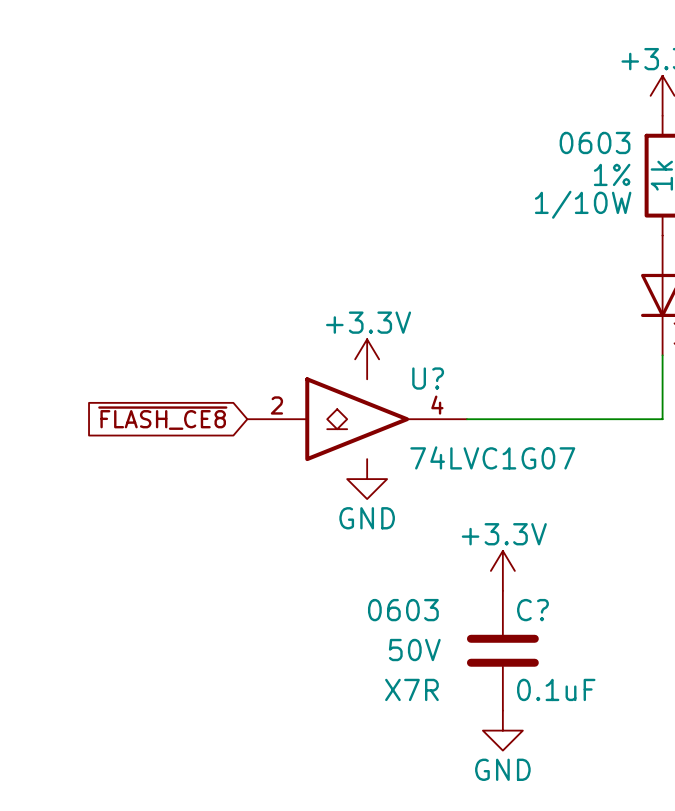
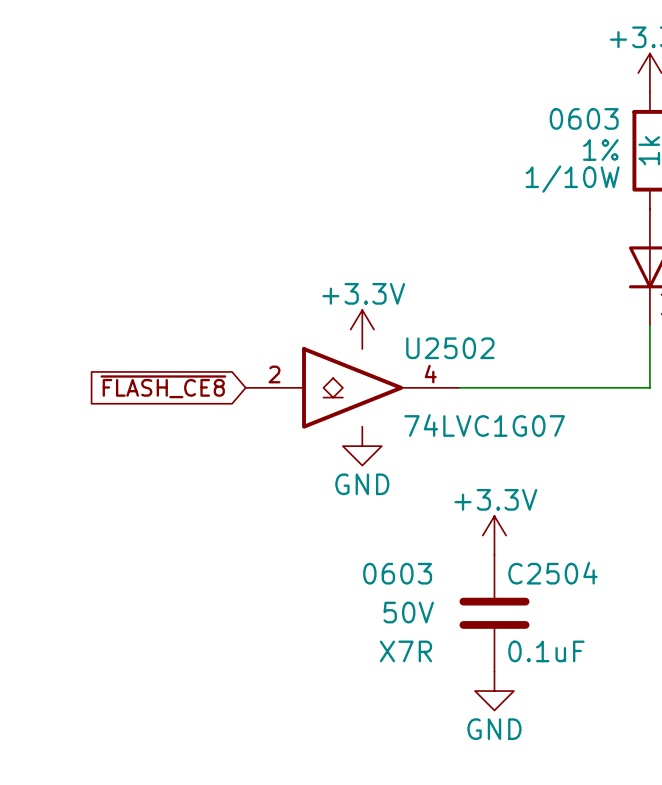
U? name: U? (428, 378) -> U2502 (450, 348)
C? name: C? (532, 610) -> C2504 (552, 573)

